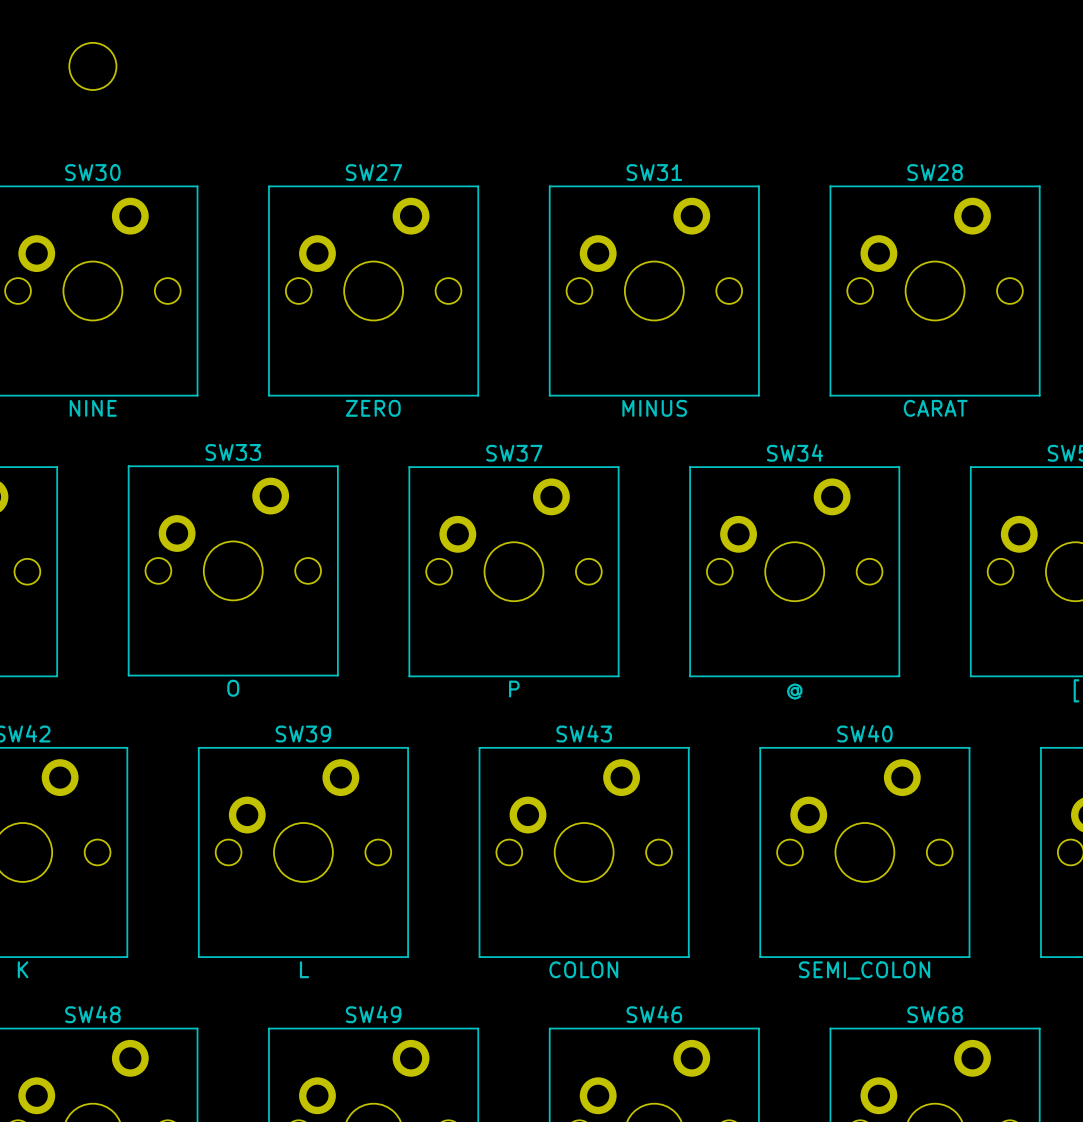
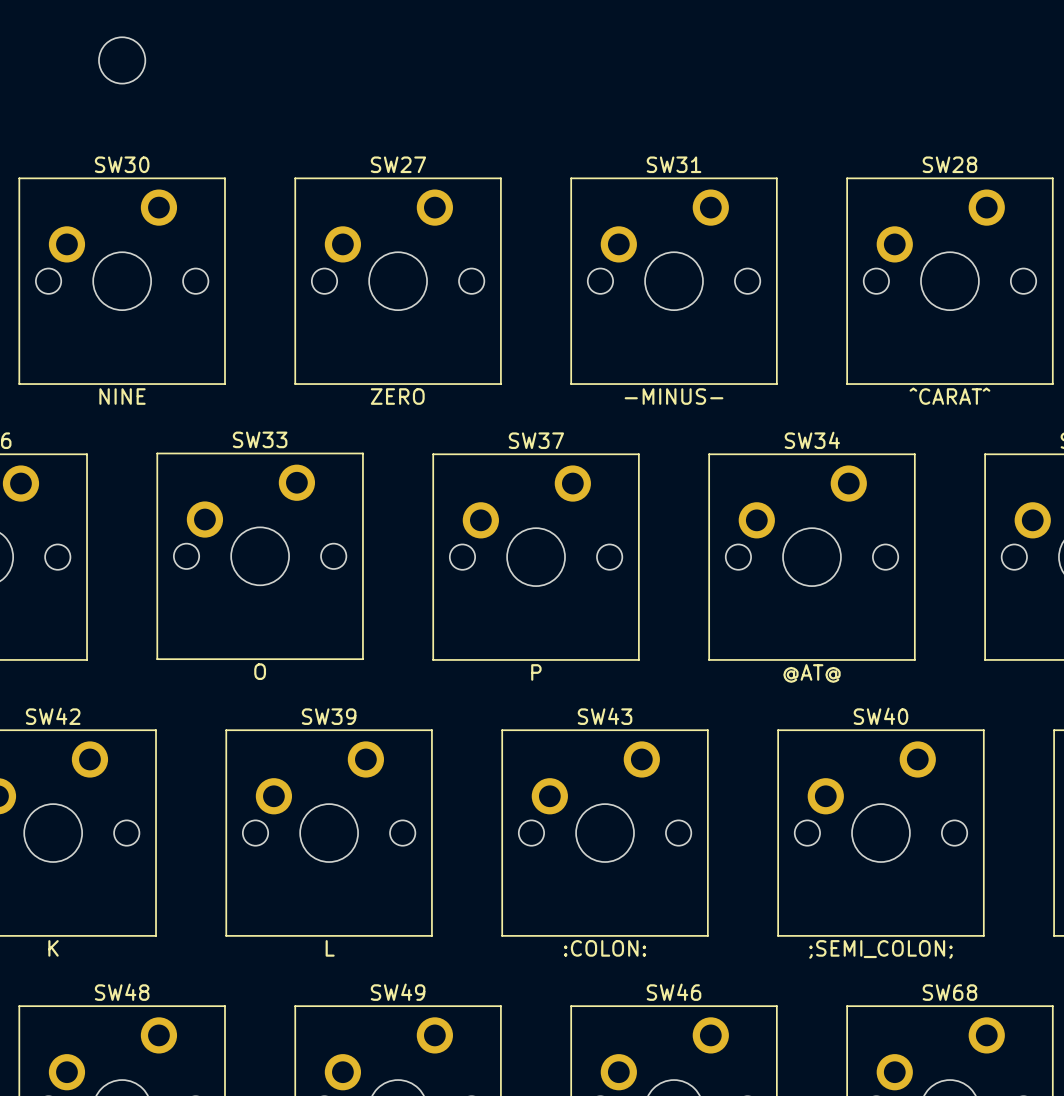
SW31 value: MINUS (654, 408) -> -MINUS- (674, 396)
SW28 value: CARAT (935, 408) -> ^CARAT^ (949, 396)
SW34 value: @ (794, 691) -> @AT@ (811, 673)
SW43 value: COLON (583, 969) -> :COLON: (605, 948)
SW40 value: SEMI_COLON (864, 970) -> ;SEMI_COLON; (880, 949)

